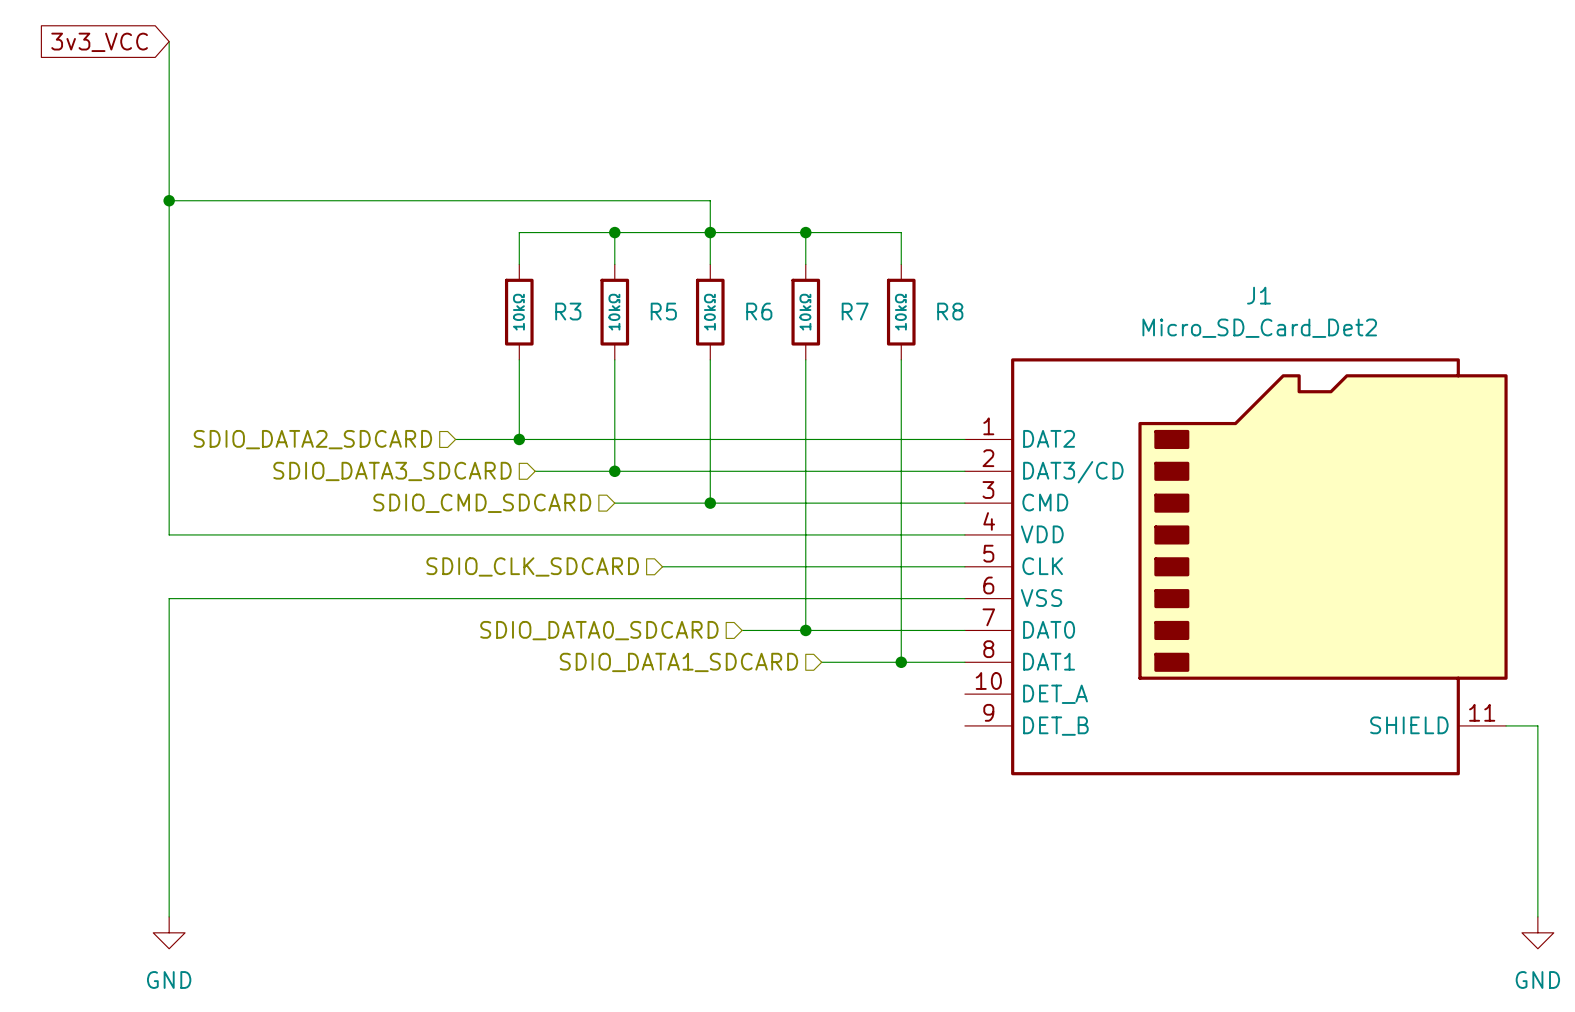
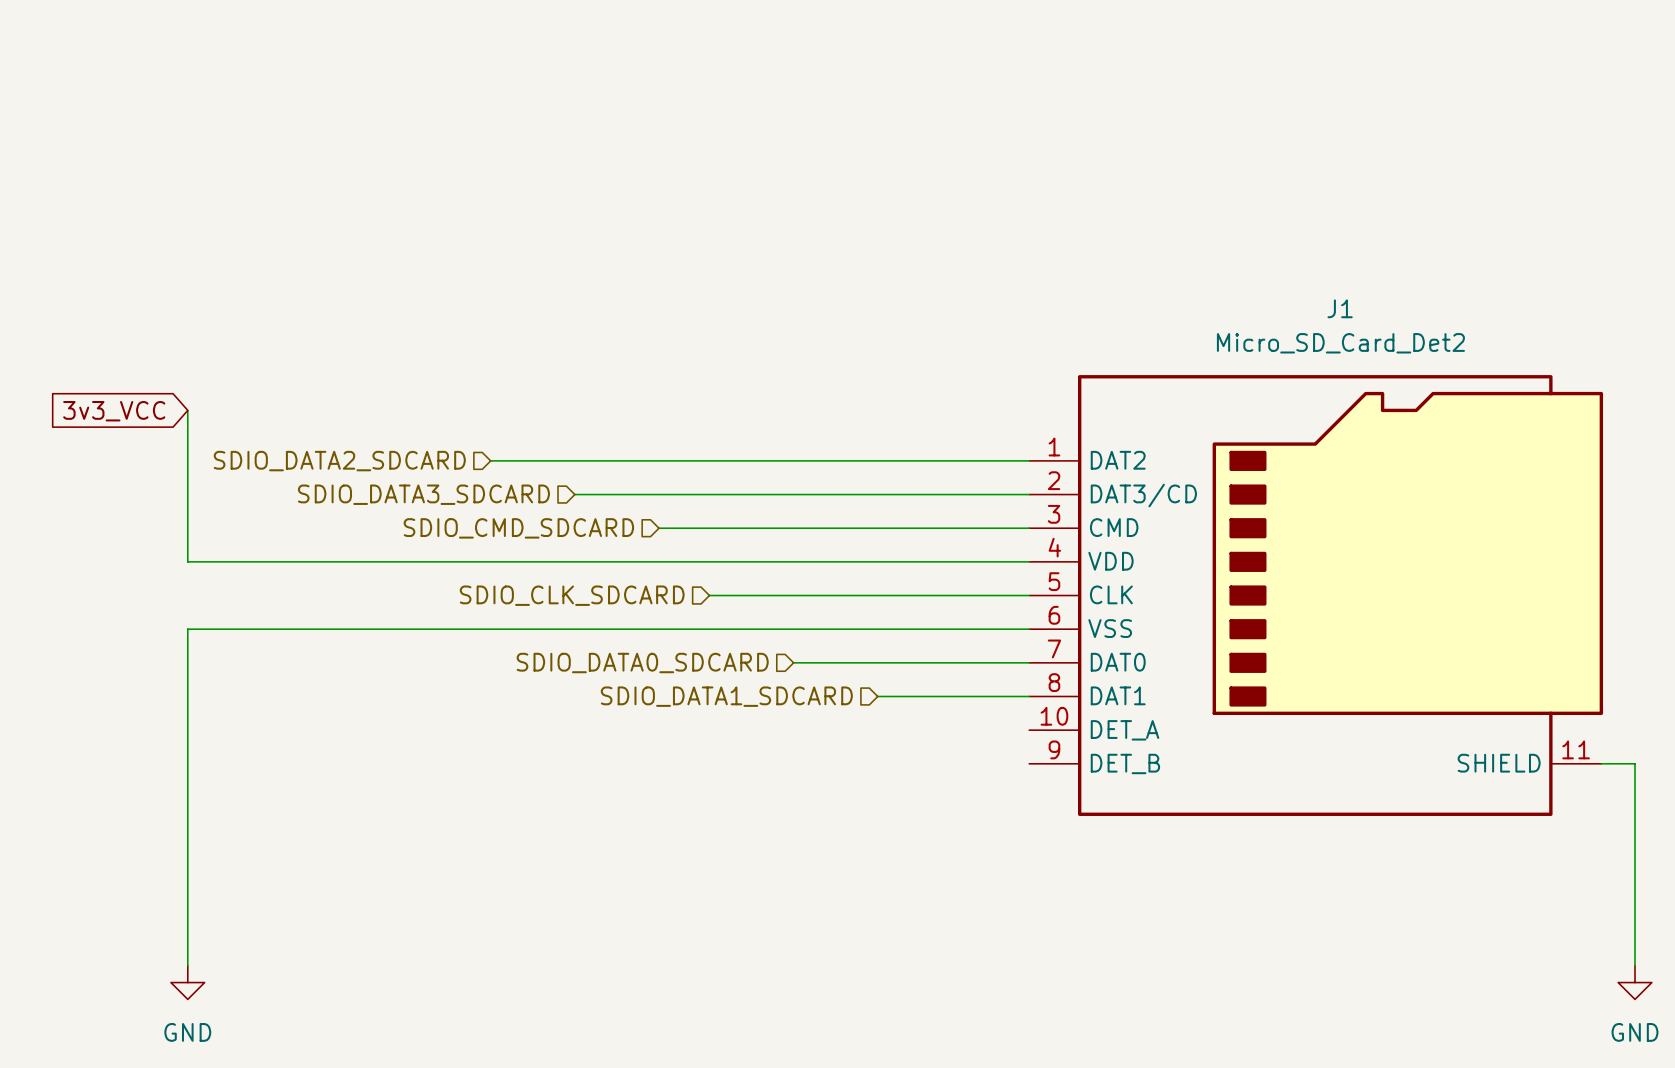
wire: (169, 41) (169, 391) -> none
global label: 3v3_VCC (99, 42) -> none
wire: (169, 200) (710, 200) (710, 264) -> none
junction: (169, 200) -> none
wire: (614, 232) (614, 264) -> none
junction: (614, 232) -> none
junction: (710, 232) -> none
wire: (805, 232) (805, 264) -> none
junction: (805, 232) -> none
wire: (519, 264) (519, 232) (901, 232) (901, 264) -> none
R3: 10kΩ (519, 312) -> none
R5: 10kΩ (614, 312) -> none
R6: 10kΩ (710, 312) -> none
R7: 10kΩ (805, 312) -> none
R8: 10kΩ (901, 312) -> none
wire: (519, 359) (519, 439) -> none
wire: (614, 359) (614, 471) -> none
wire: (710, 359) (710, 503) -> none
wire: (805, 359) (805, 630) -> none
wire: (901, 359) (901, 662) -> none
global label: none -> 3v3_VCC (114, 411)
junction: (519, 439) -> none
junction: (614, 471) -> none
junction: (710, 503) -> none
junction: (805, 630) -> none
junction: (901, 662) -> none

